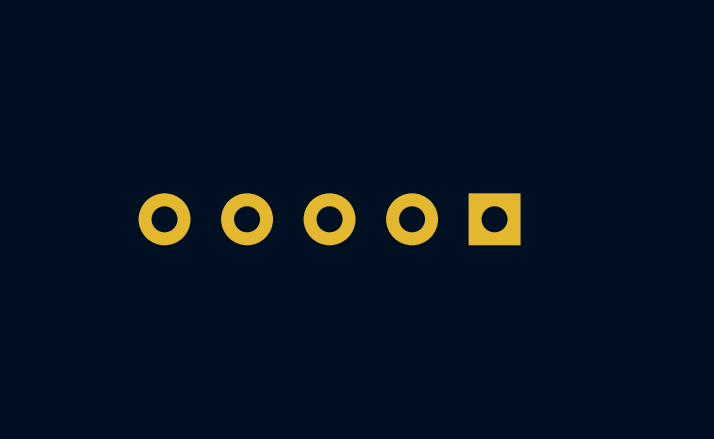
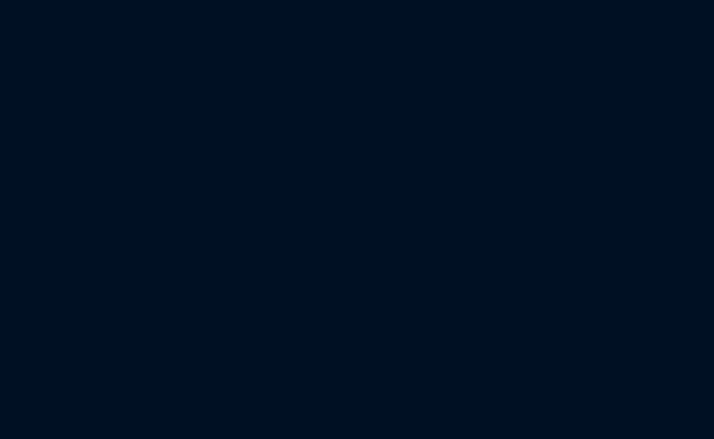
part: (329, 219) -> none

